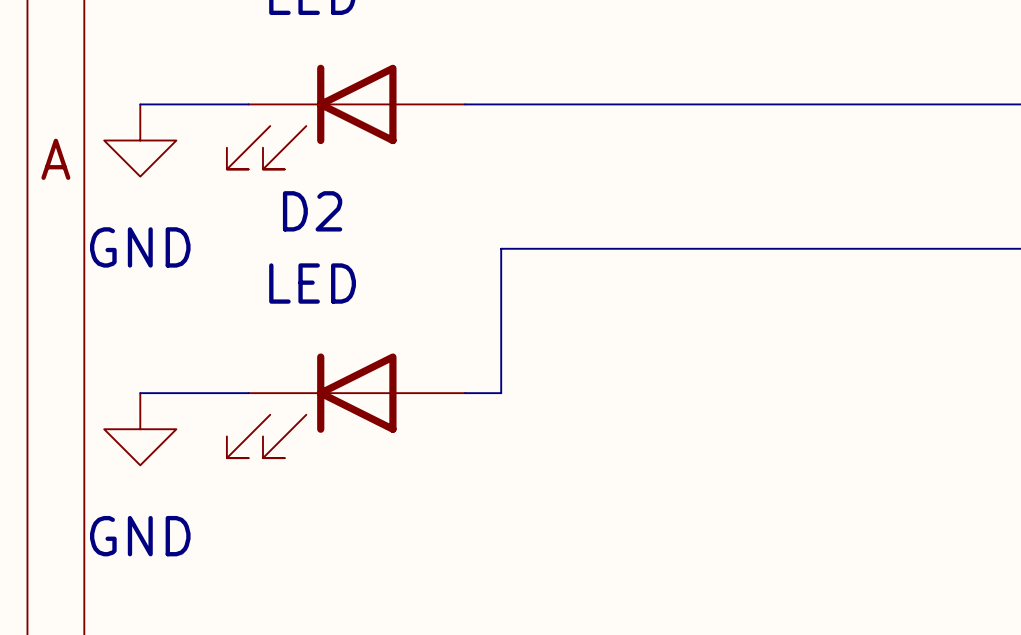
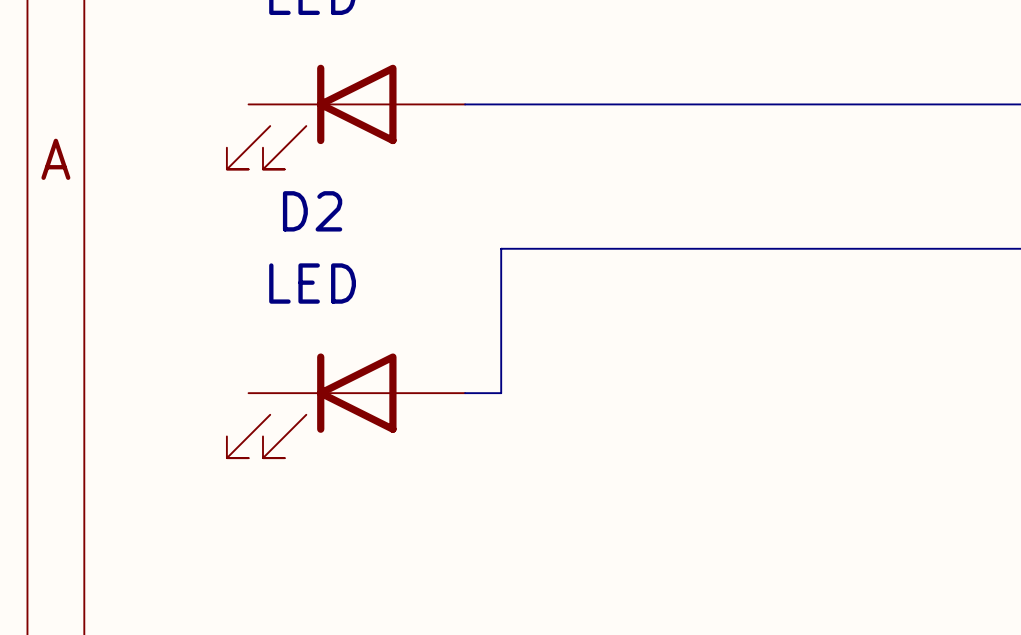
wire: (140, 104) (248, 104) -> none
power symbol: GND (140, 140) -> none
wire: (140, 393) (248, 393) -> none
power symbol: GND (140, 429) -> none

